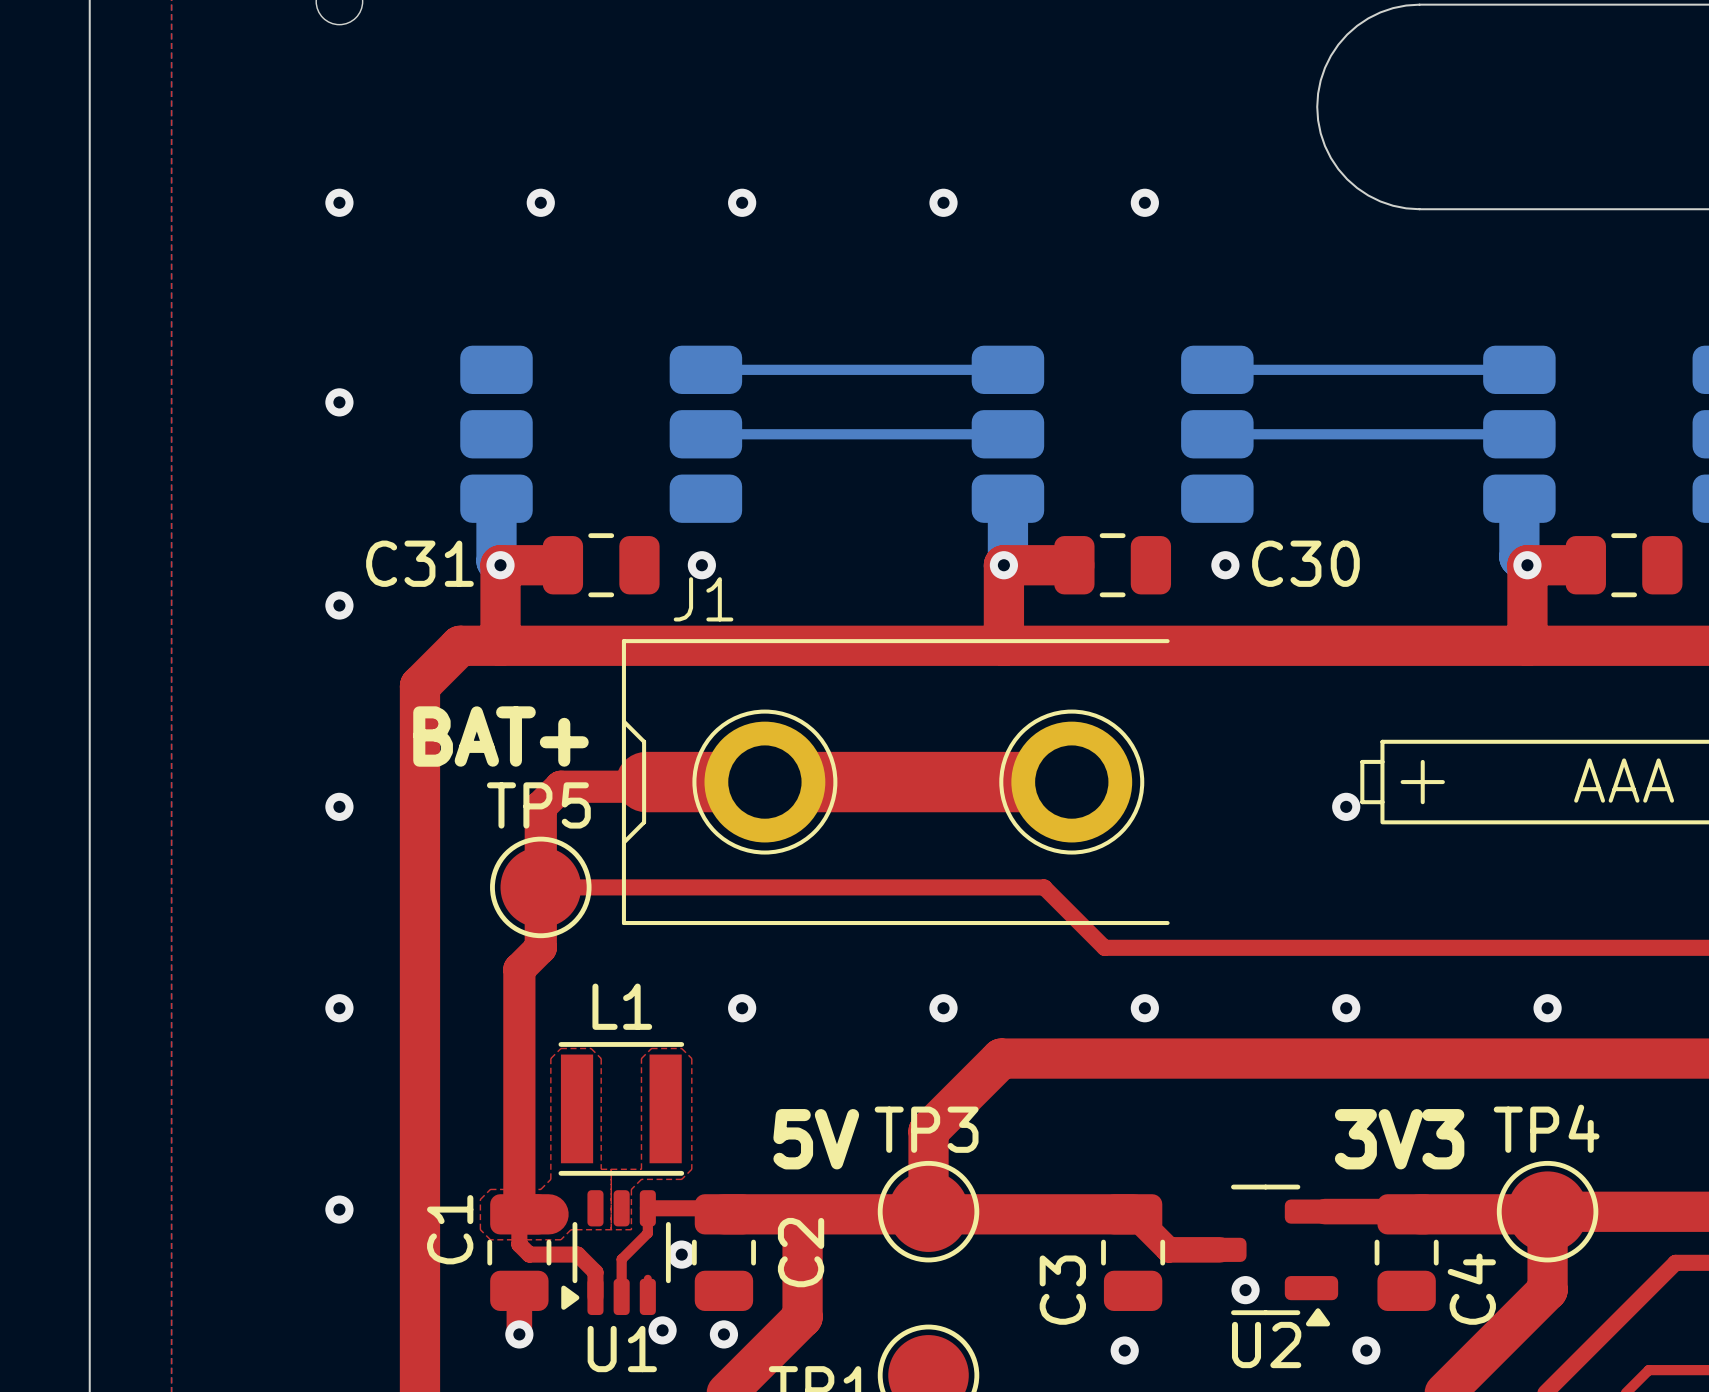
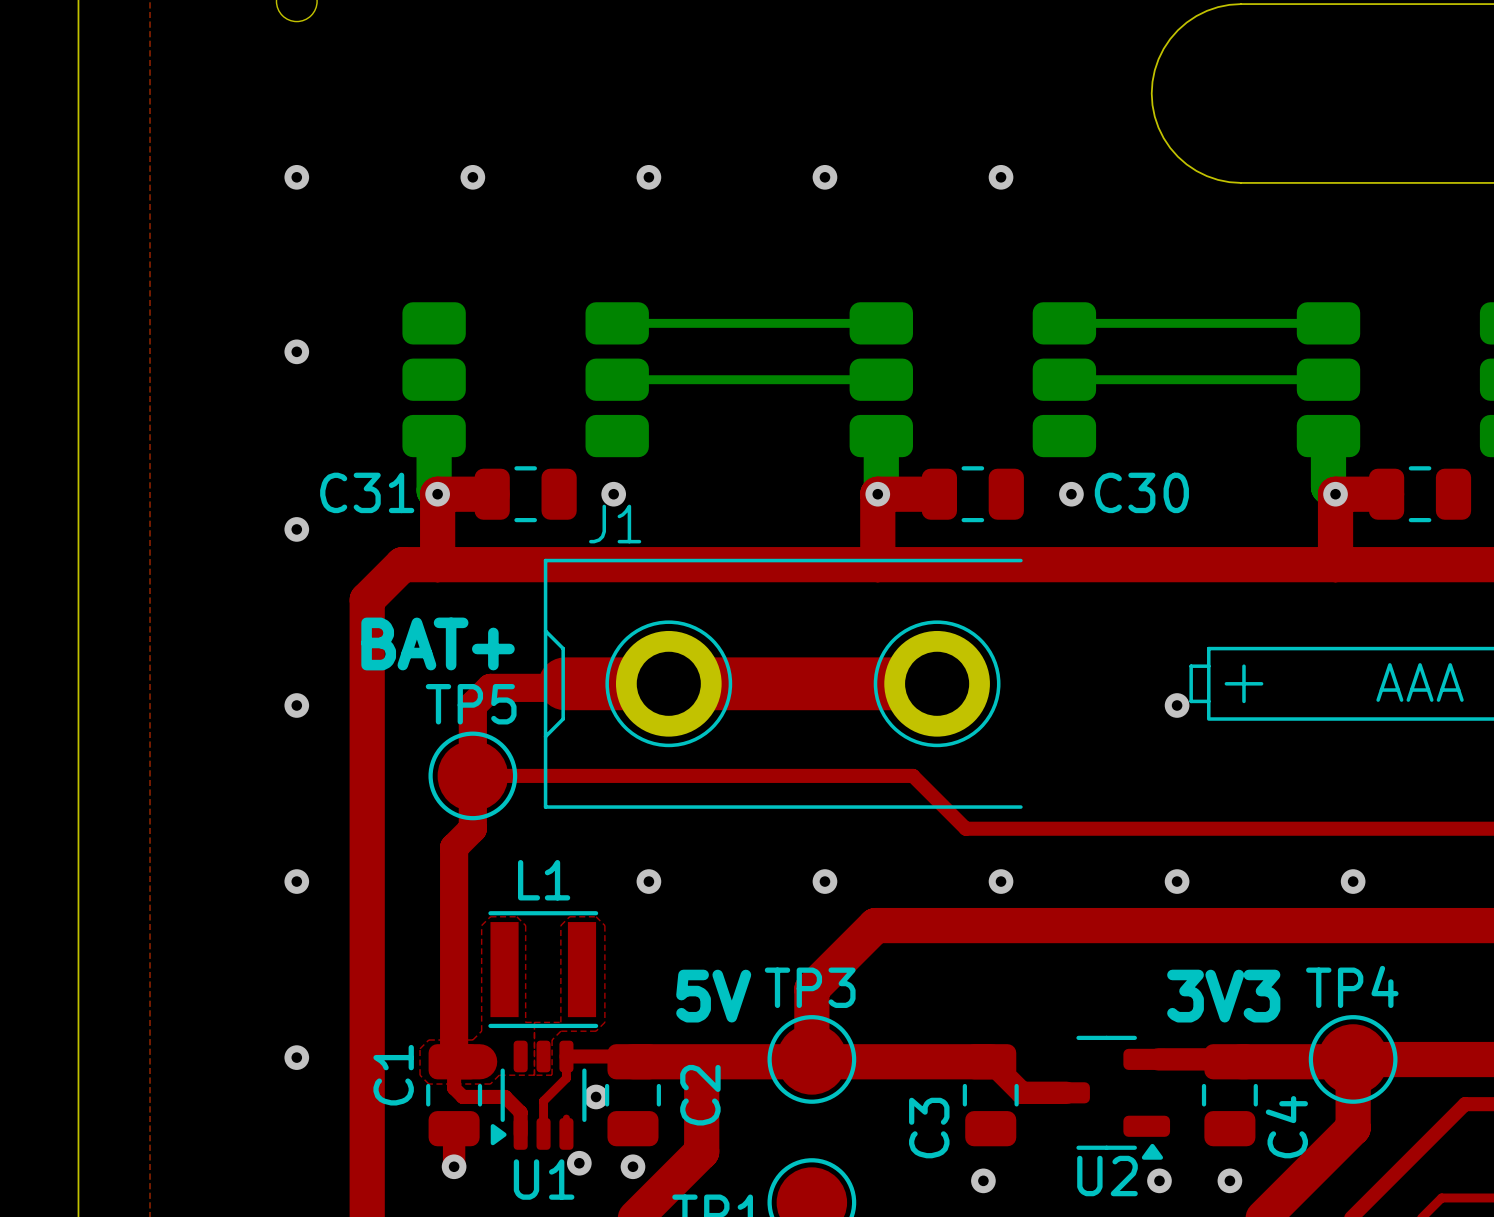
via: (1245, 1290) -> none
via: none -> (1159, 1180)
via: (1366, 1350) -> none
via: none -> (1229, 1180)

